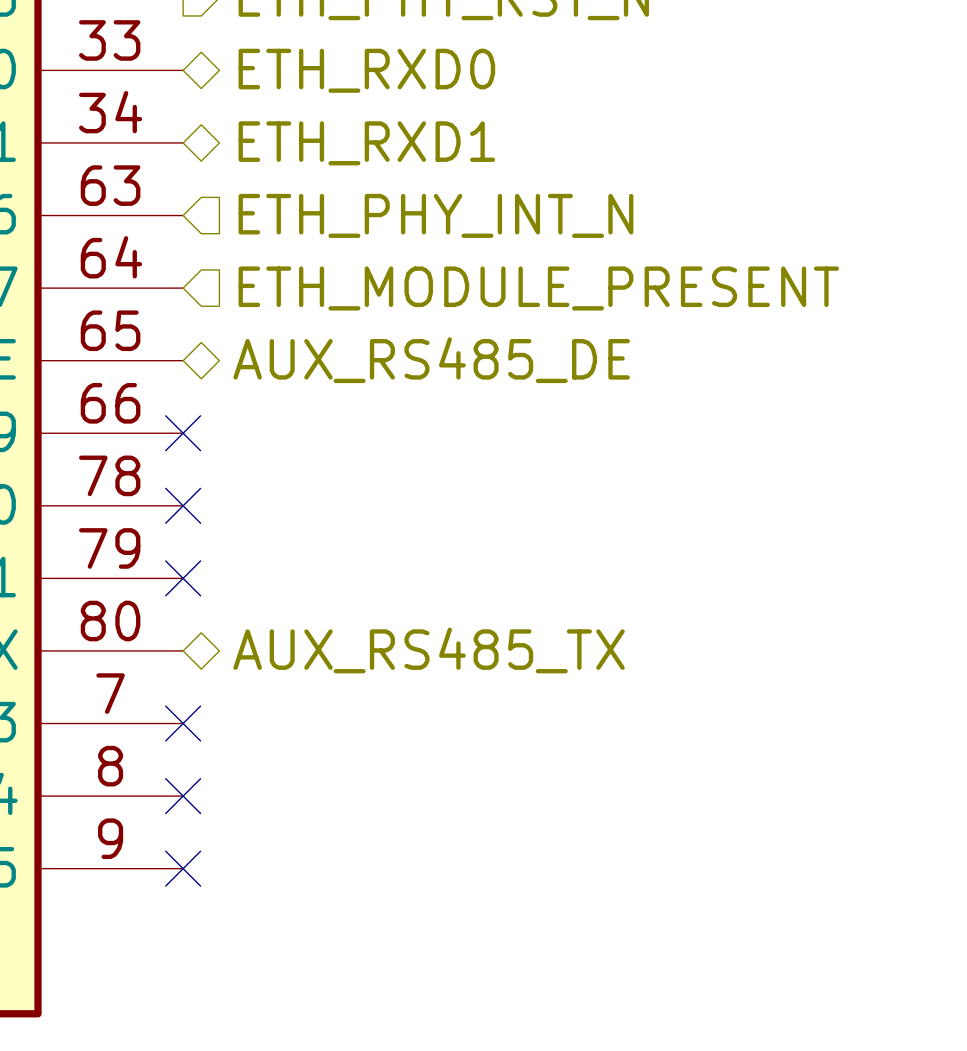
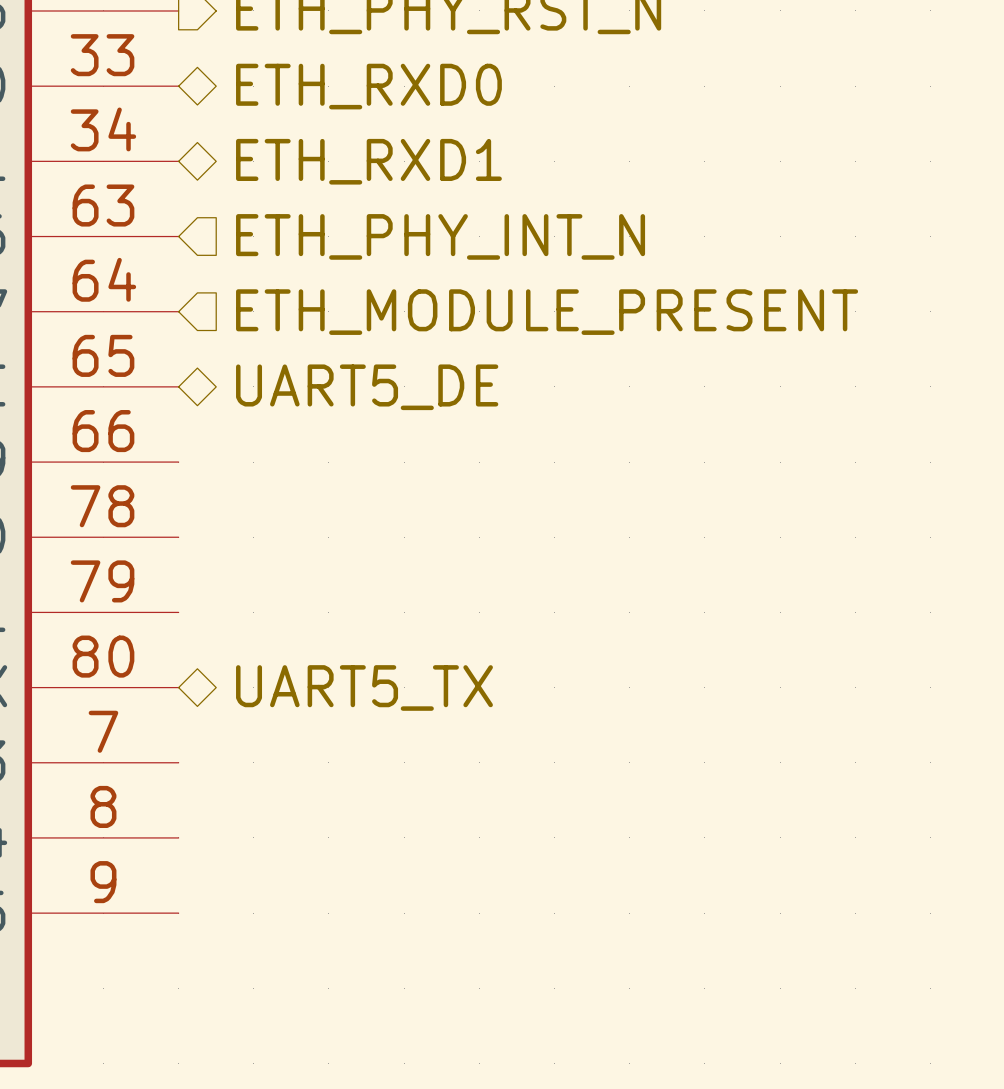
hierarchical label: AUX_RS485_DE (431, 360) -> UART5_DE (367, 387)
no-connect mark: (183, 433) -> none
no-connect mark: (183, 505) -> none
no-connect mark: (183, 578) -> none
hierarchical label: AUX_RS485_TX (429, 650) -> UART5_TX (364, 687)
no-connect mark: (183, 723) -> none
no-connect mark: (183, 796) -> none
no-connect mark: (183, 868) -> none

